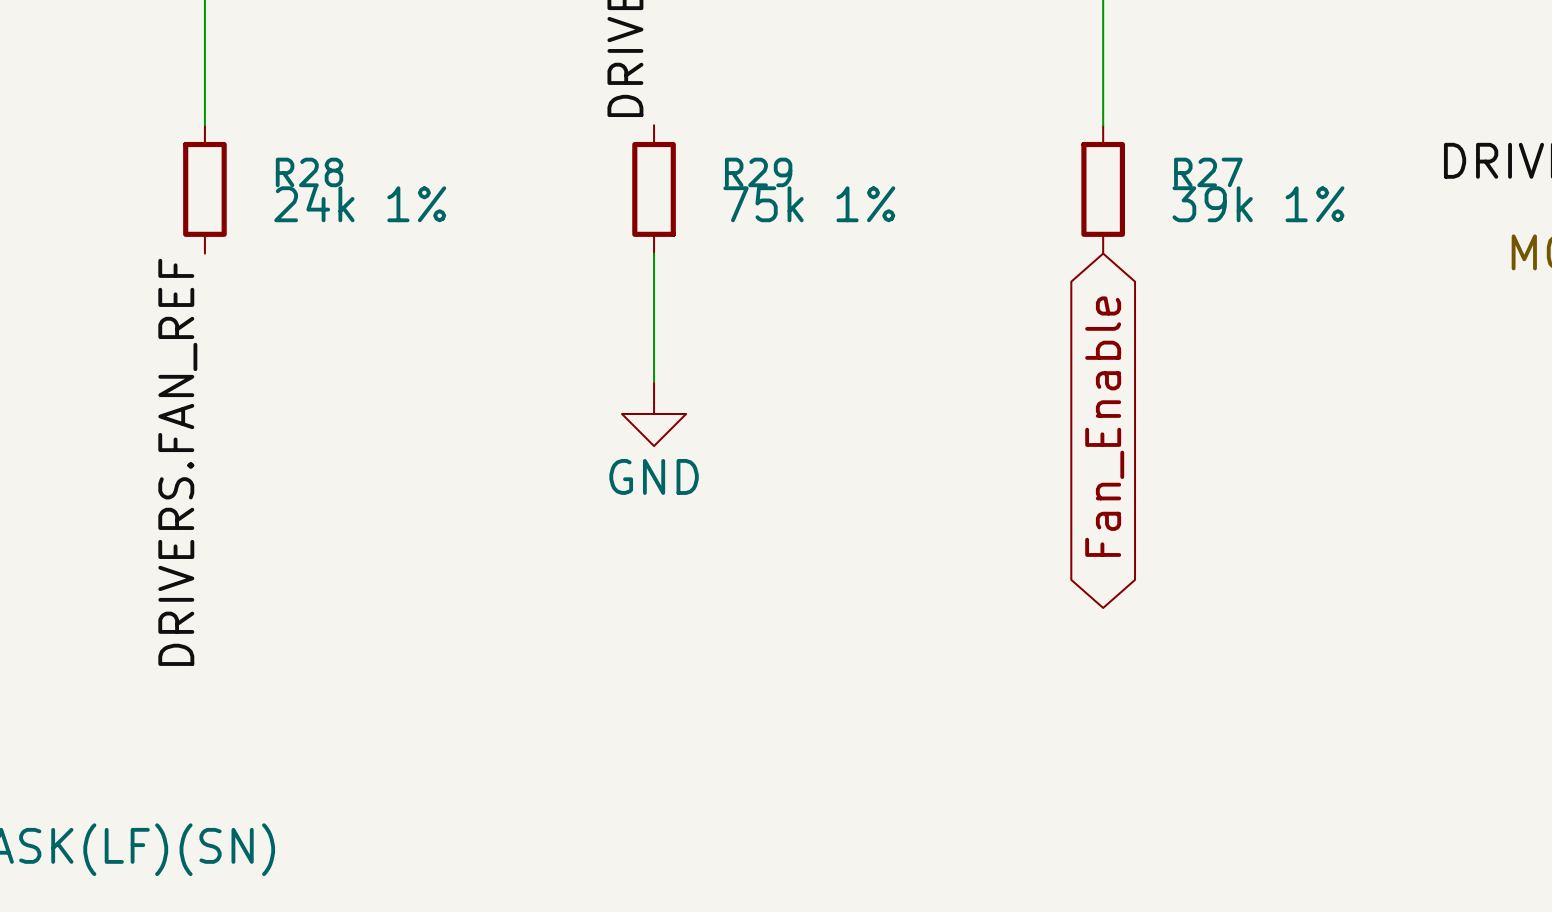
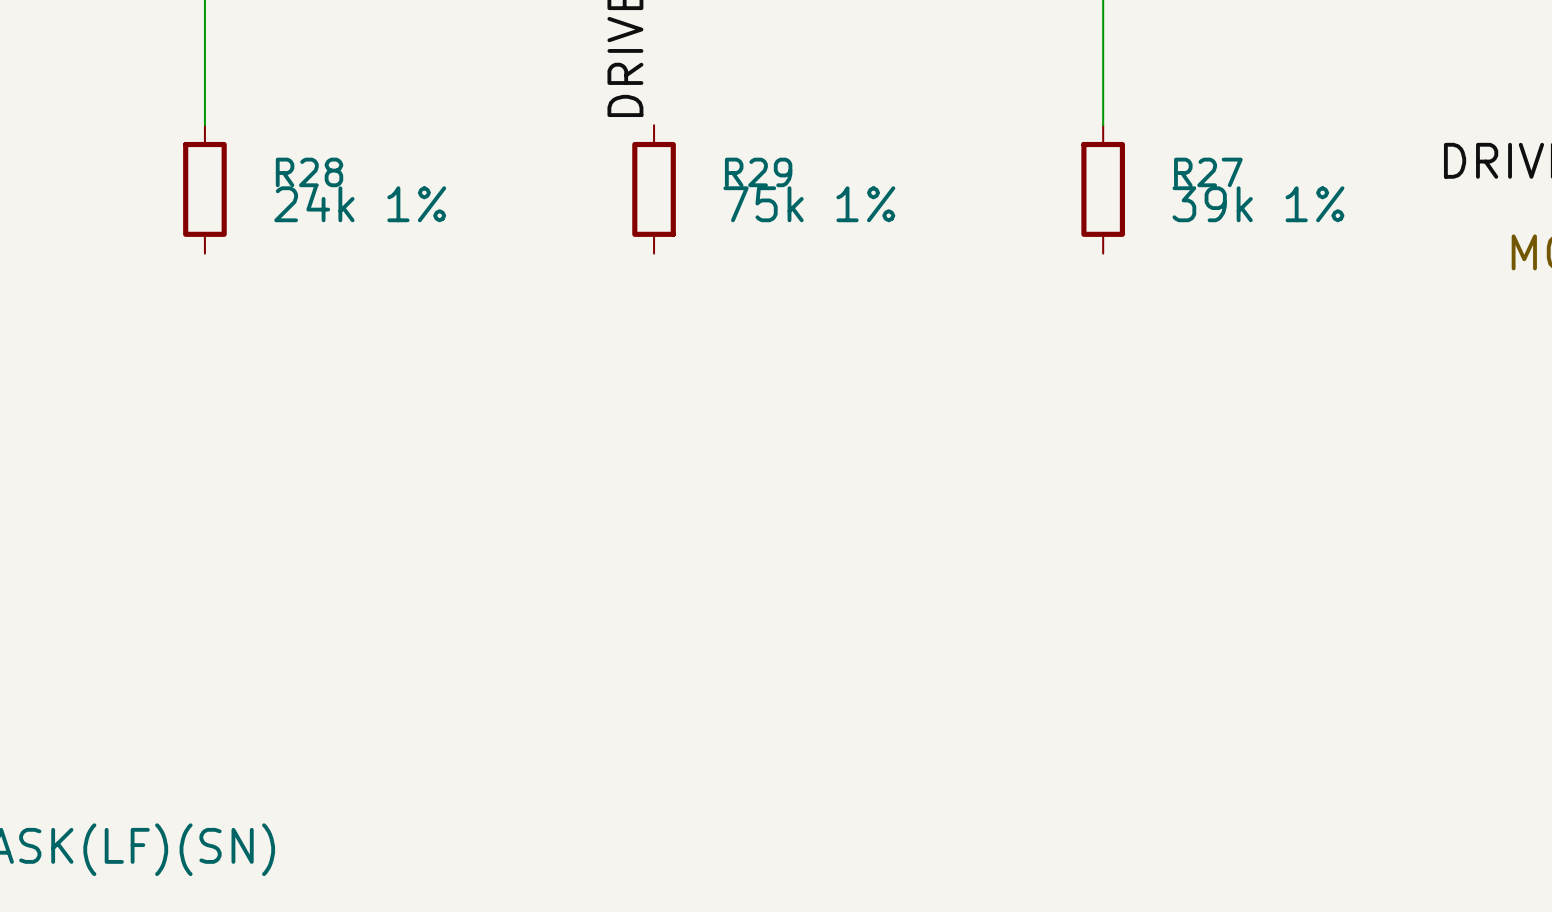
wire: (654, 253) (654, 381) -> none
power symbol: GND (654, 413) -> none
global label: Fan_Enable (1104, 426) -> none
label: DRIVERS.FAN_REF (177, 462) -> none

